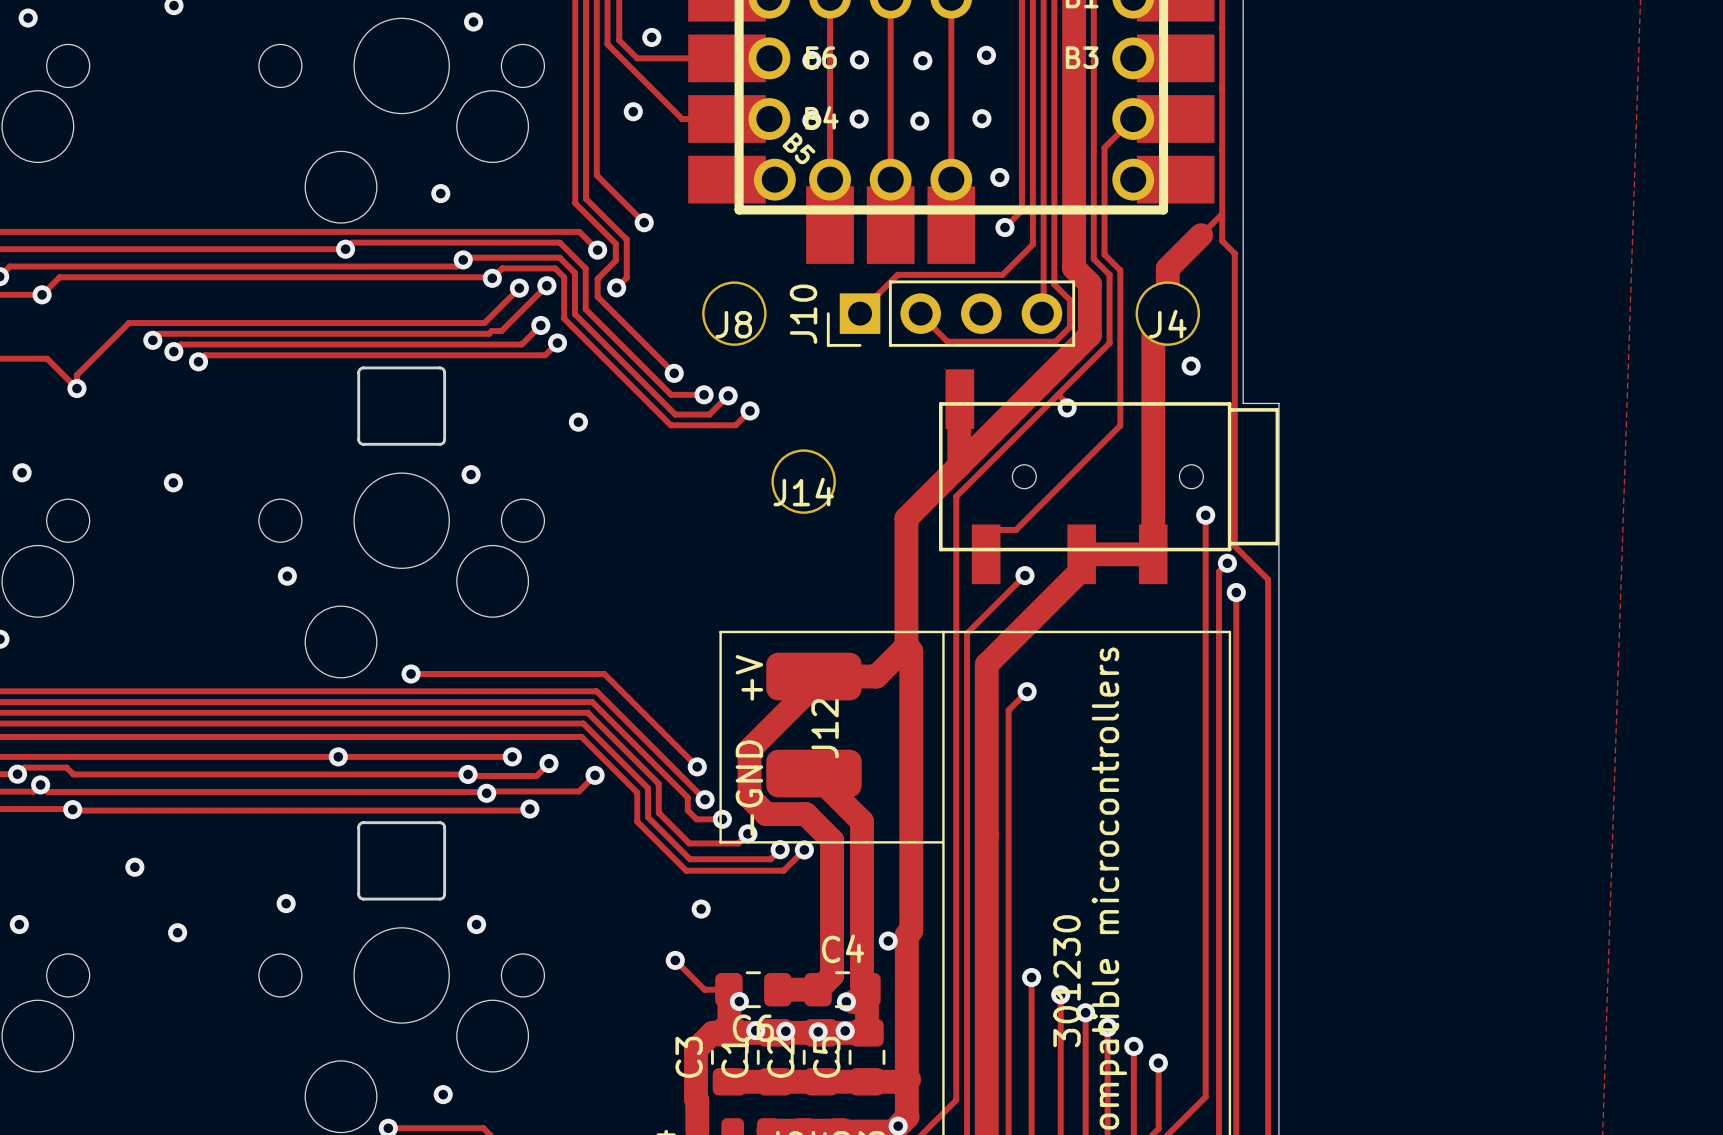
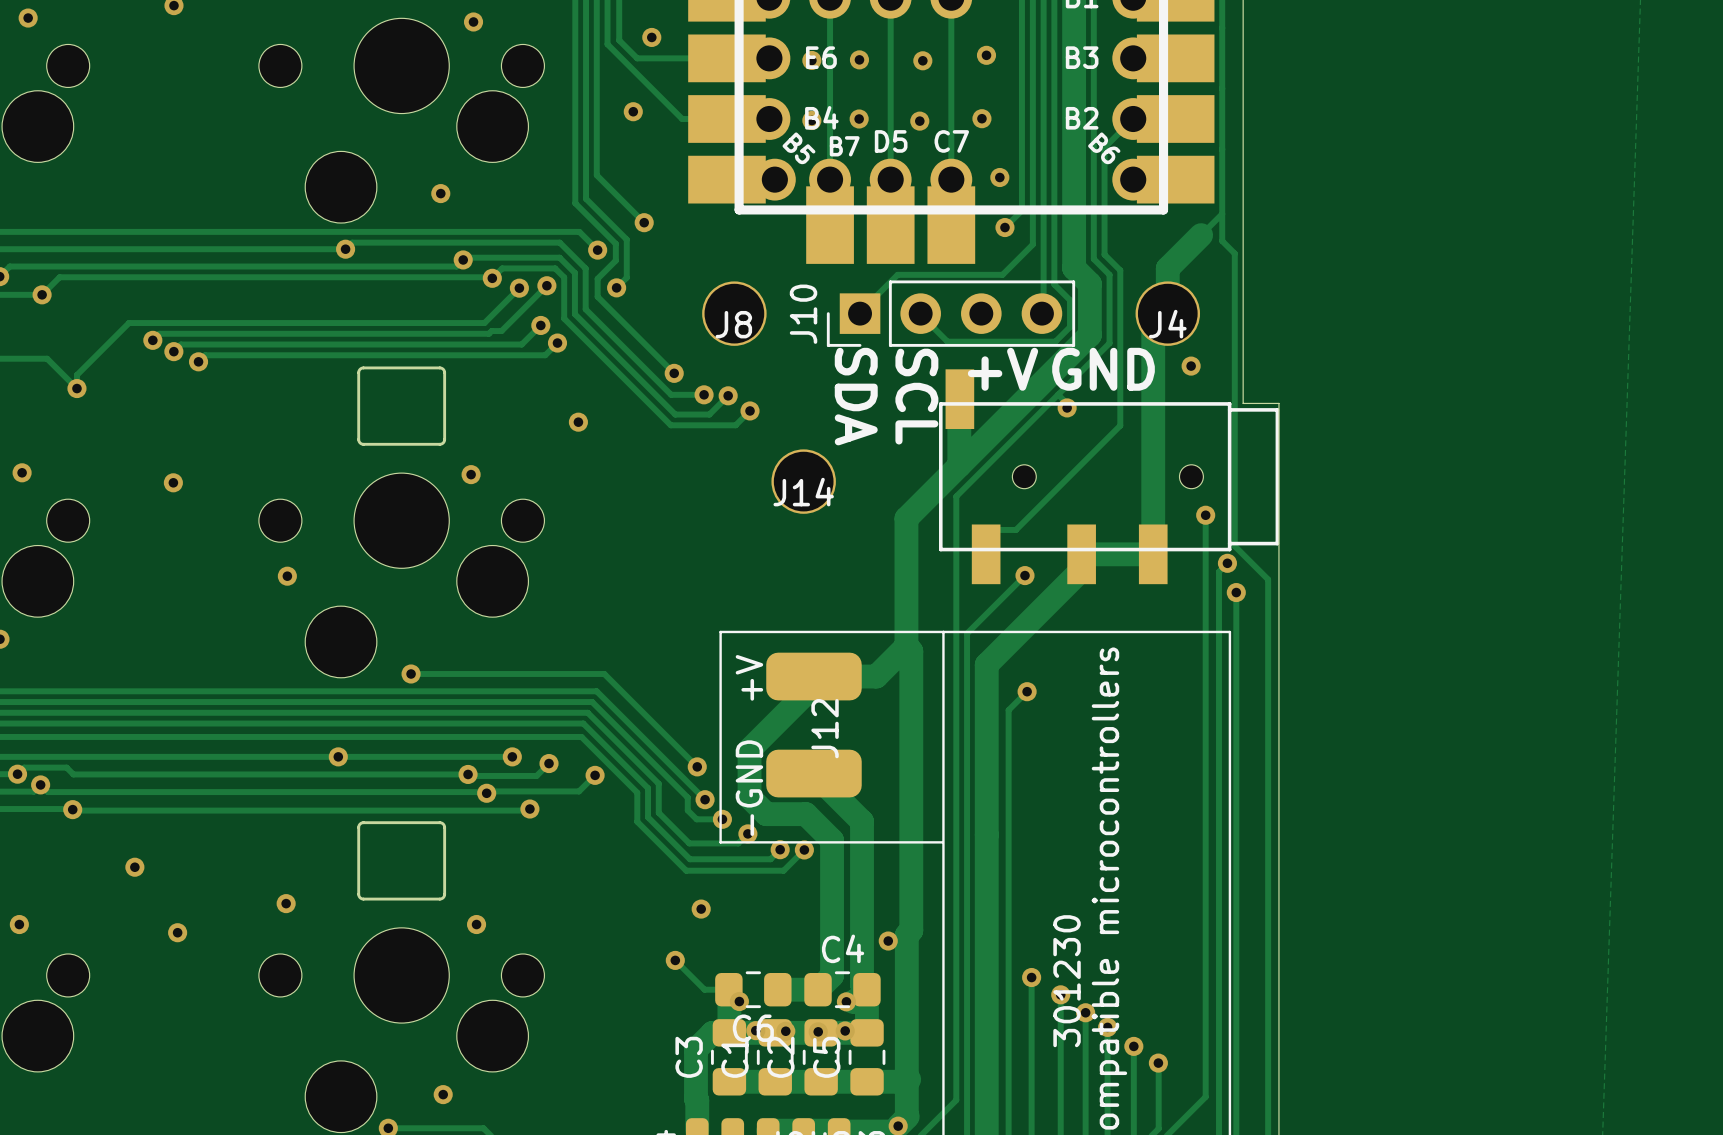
part text: none -> B2 (1082, 118)
part text: none -> D5 (891, 141)
part text: none -> C7 (951, 141)
part text: none -> B7 (844, 146)
part text: none -> B6 (1104, 148)
text: none -> +V (1002, 369)
text: none -> GND (1103, 369)
text: none -> SDA (856, 396)
text: none -> SCL (916, 396)

